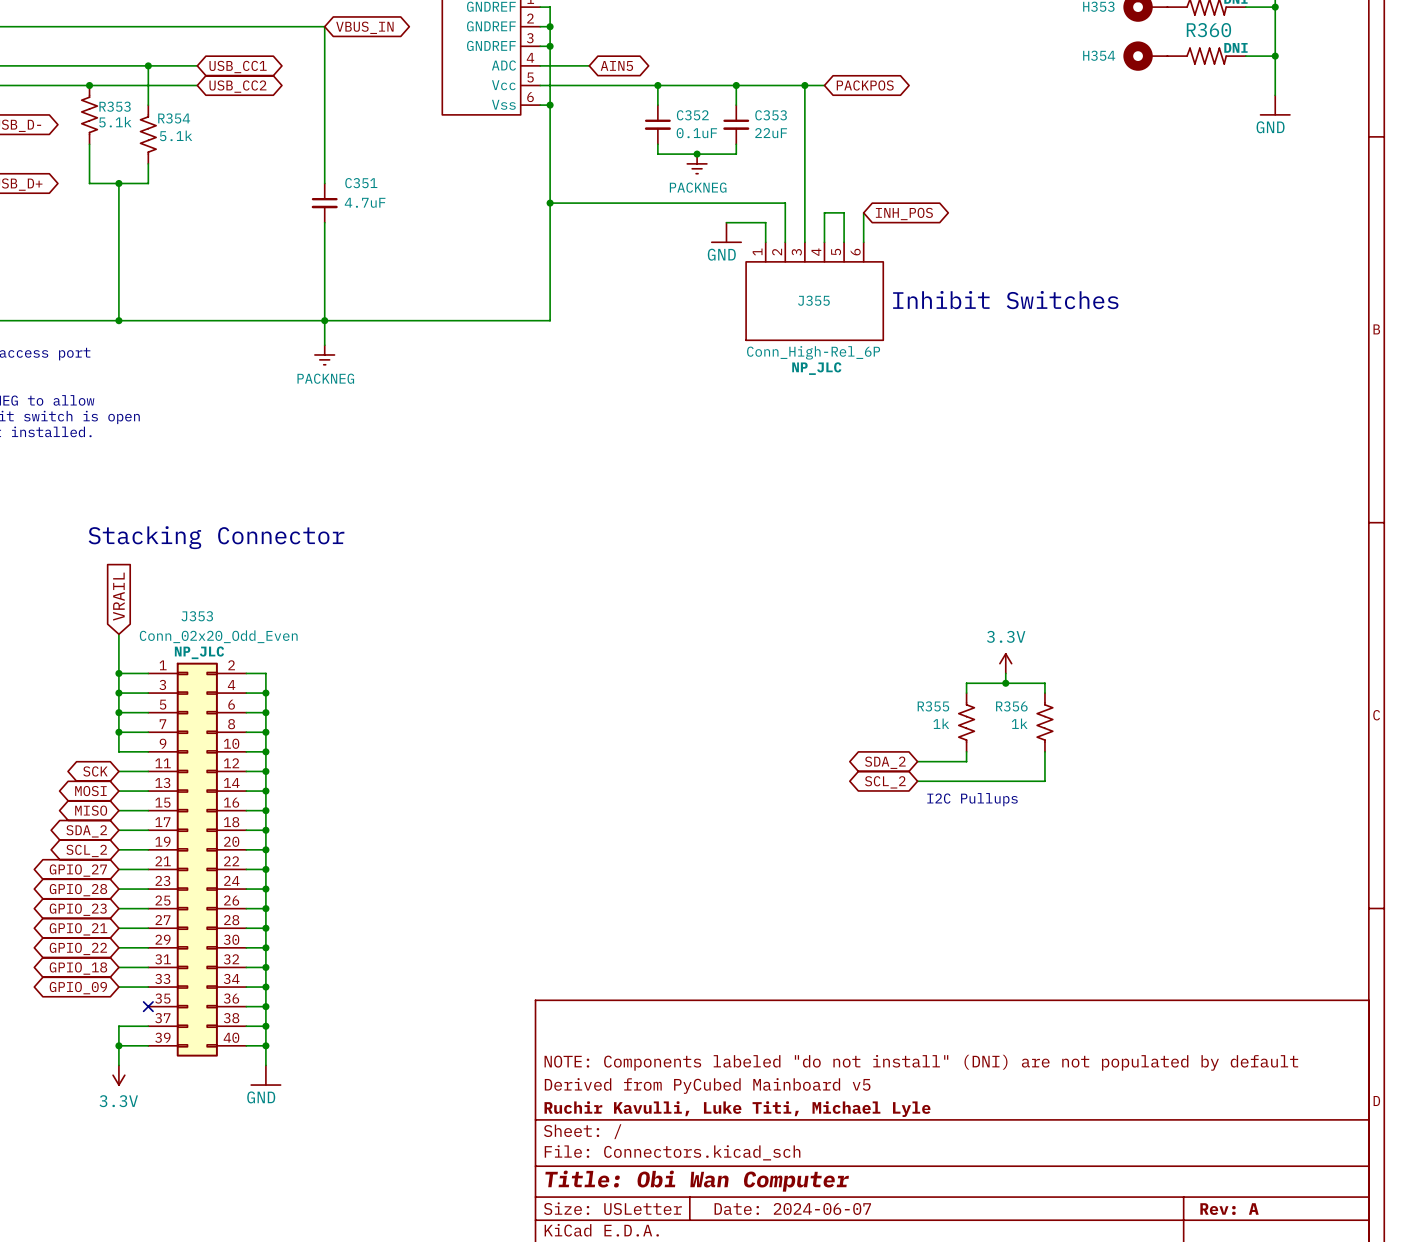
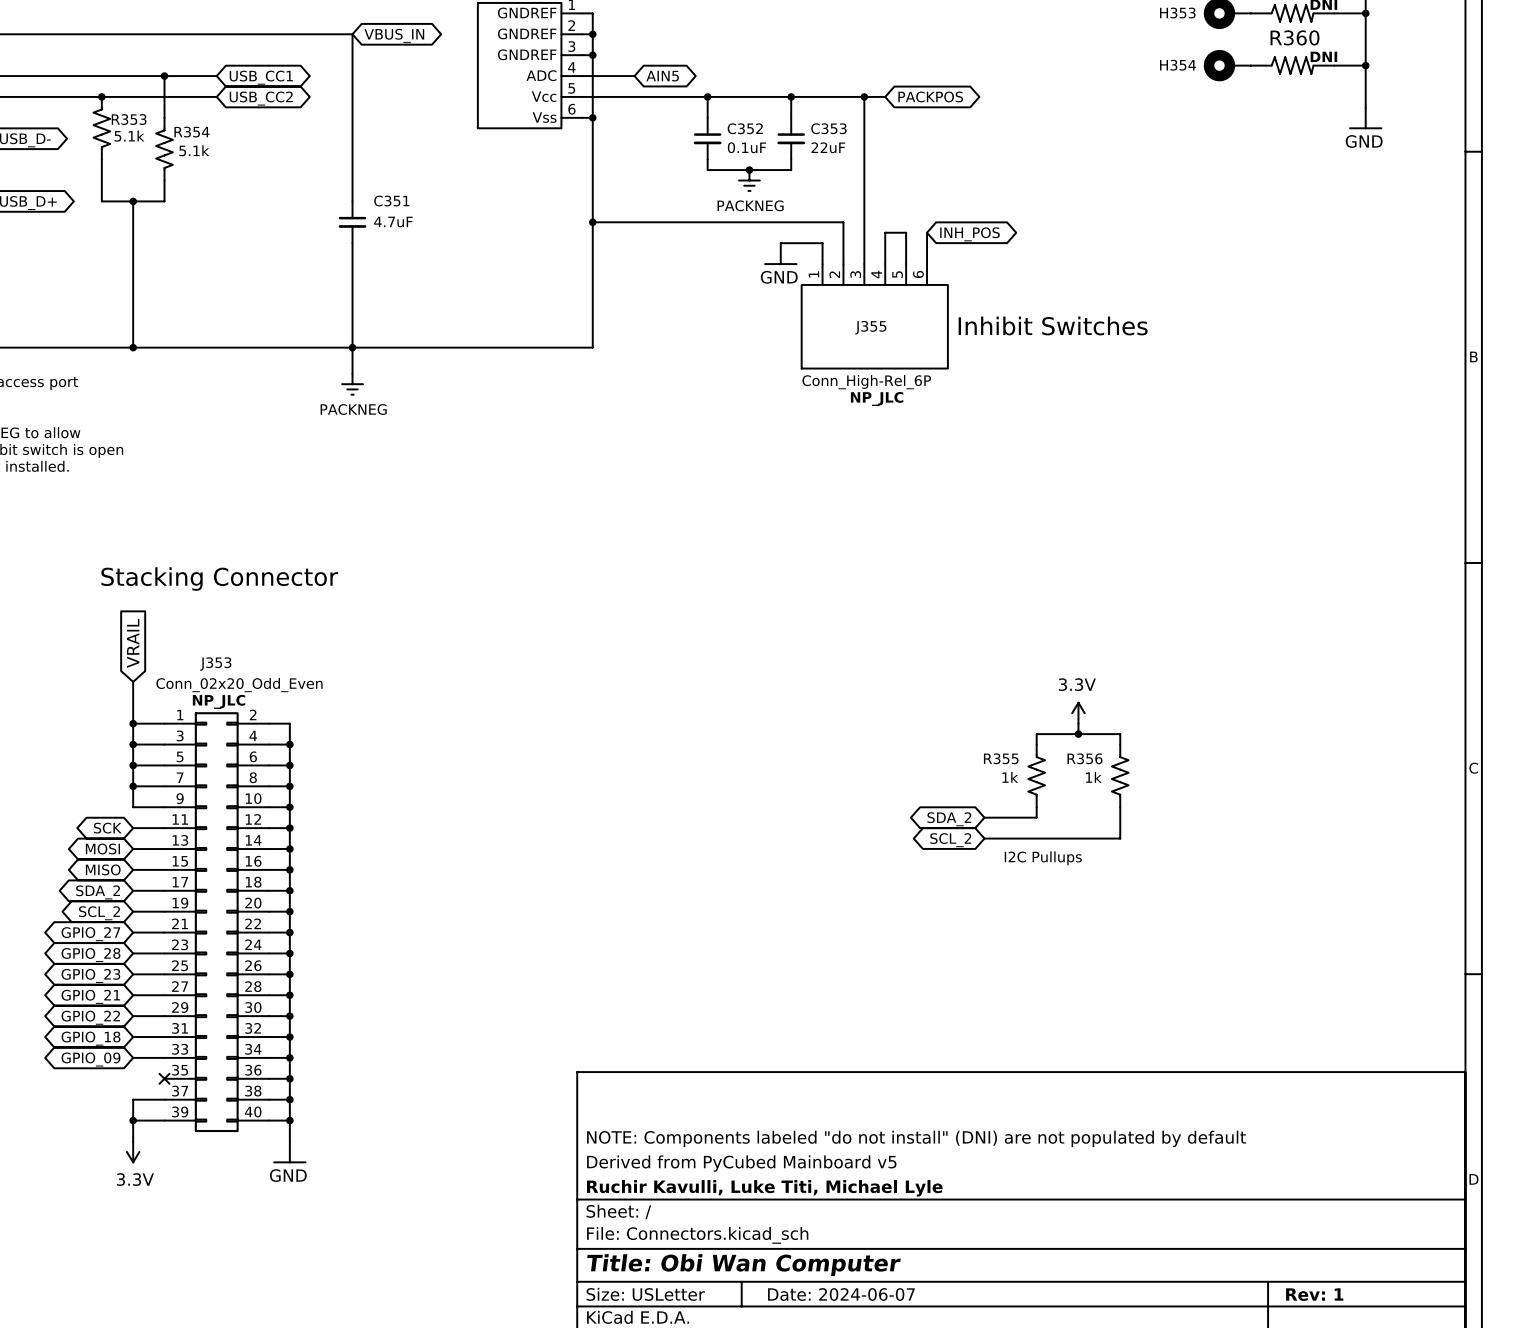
title block: Rev: A (1229, 1209) -> Rev: 1 (1314, 1294)

